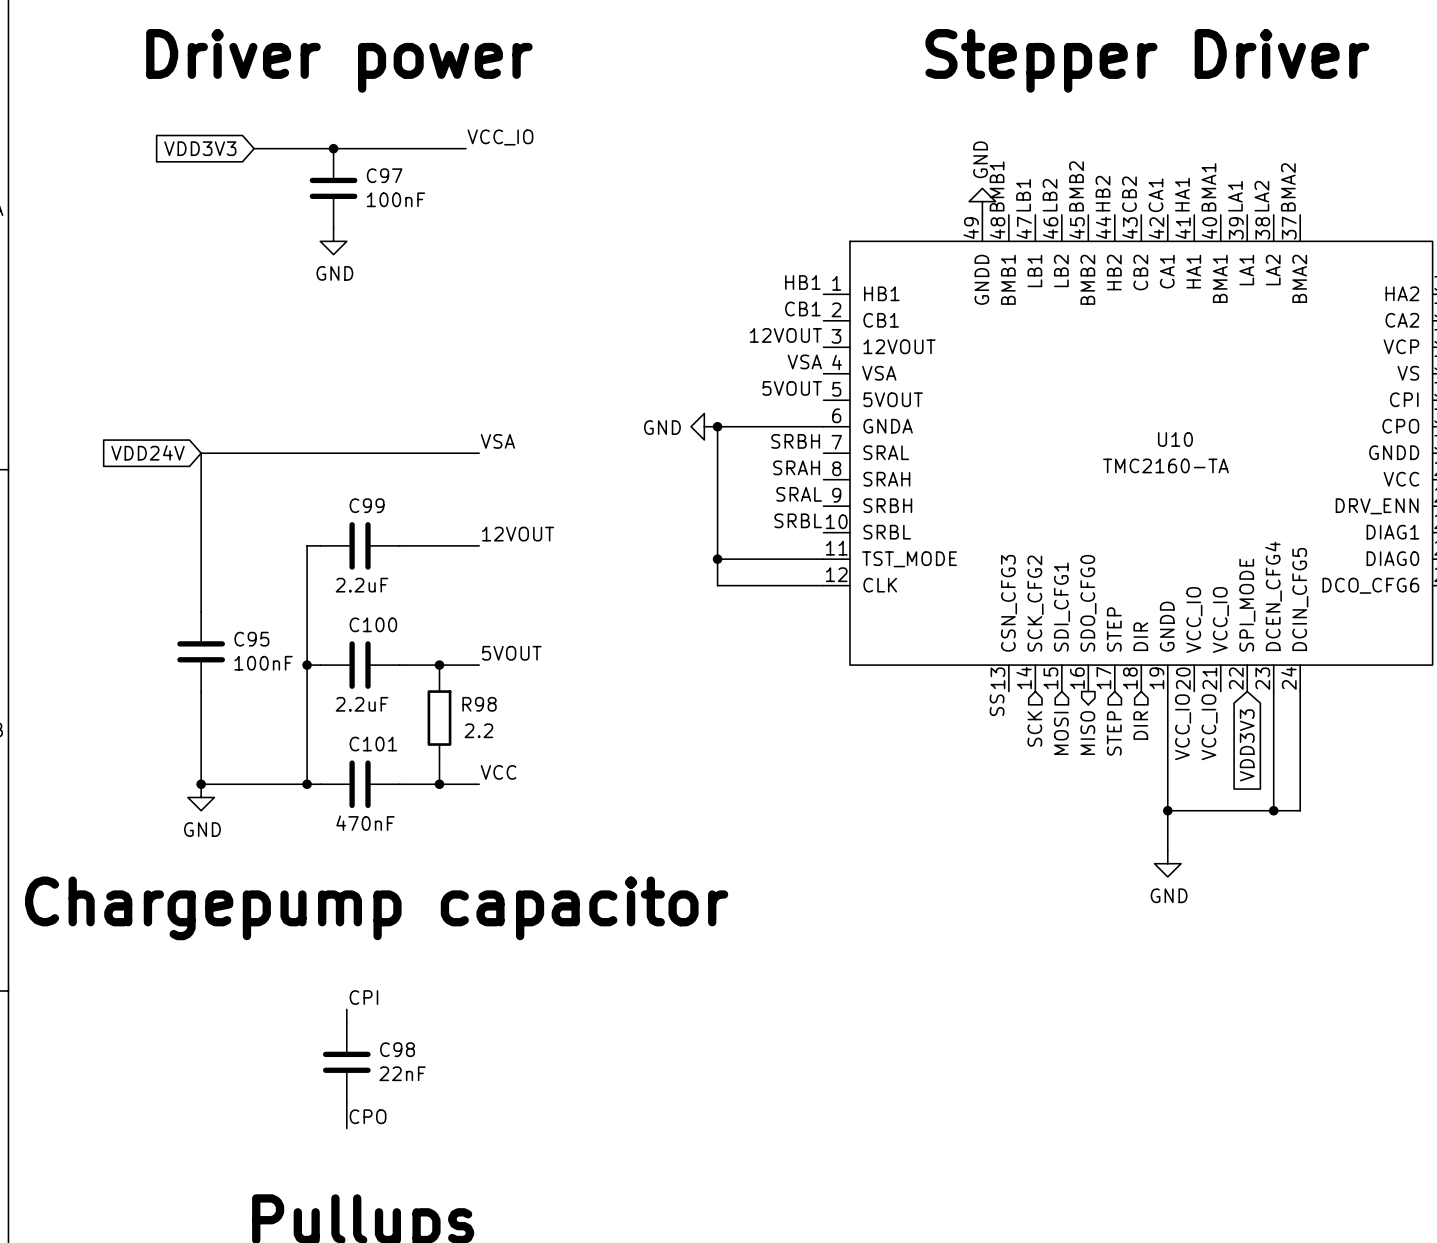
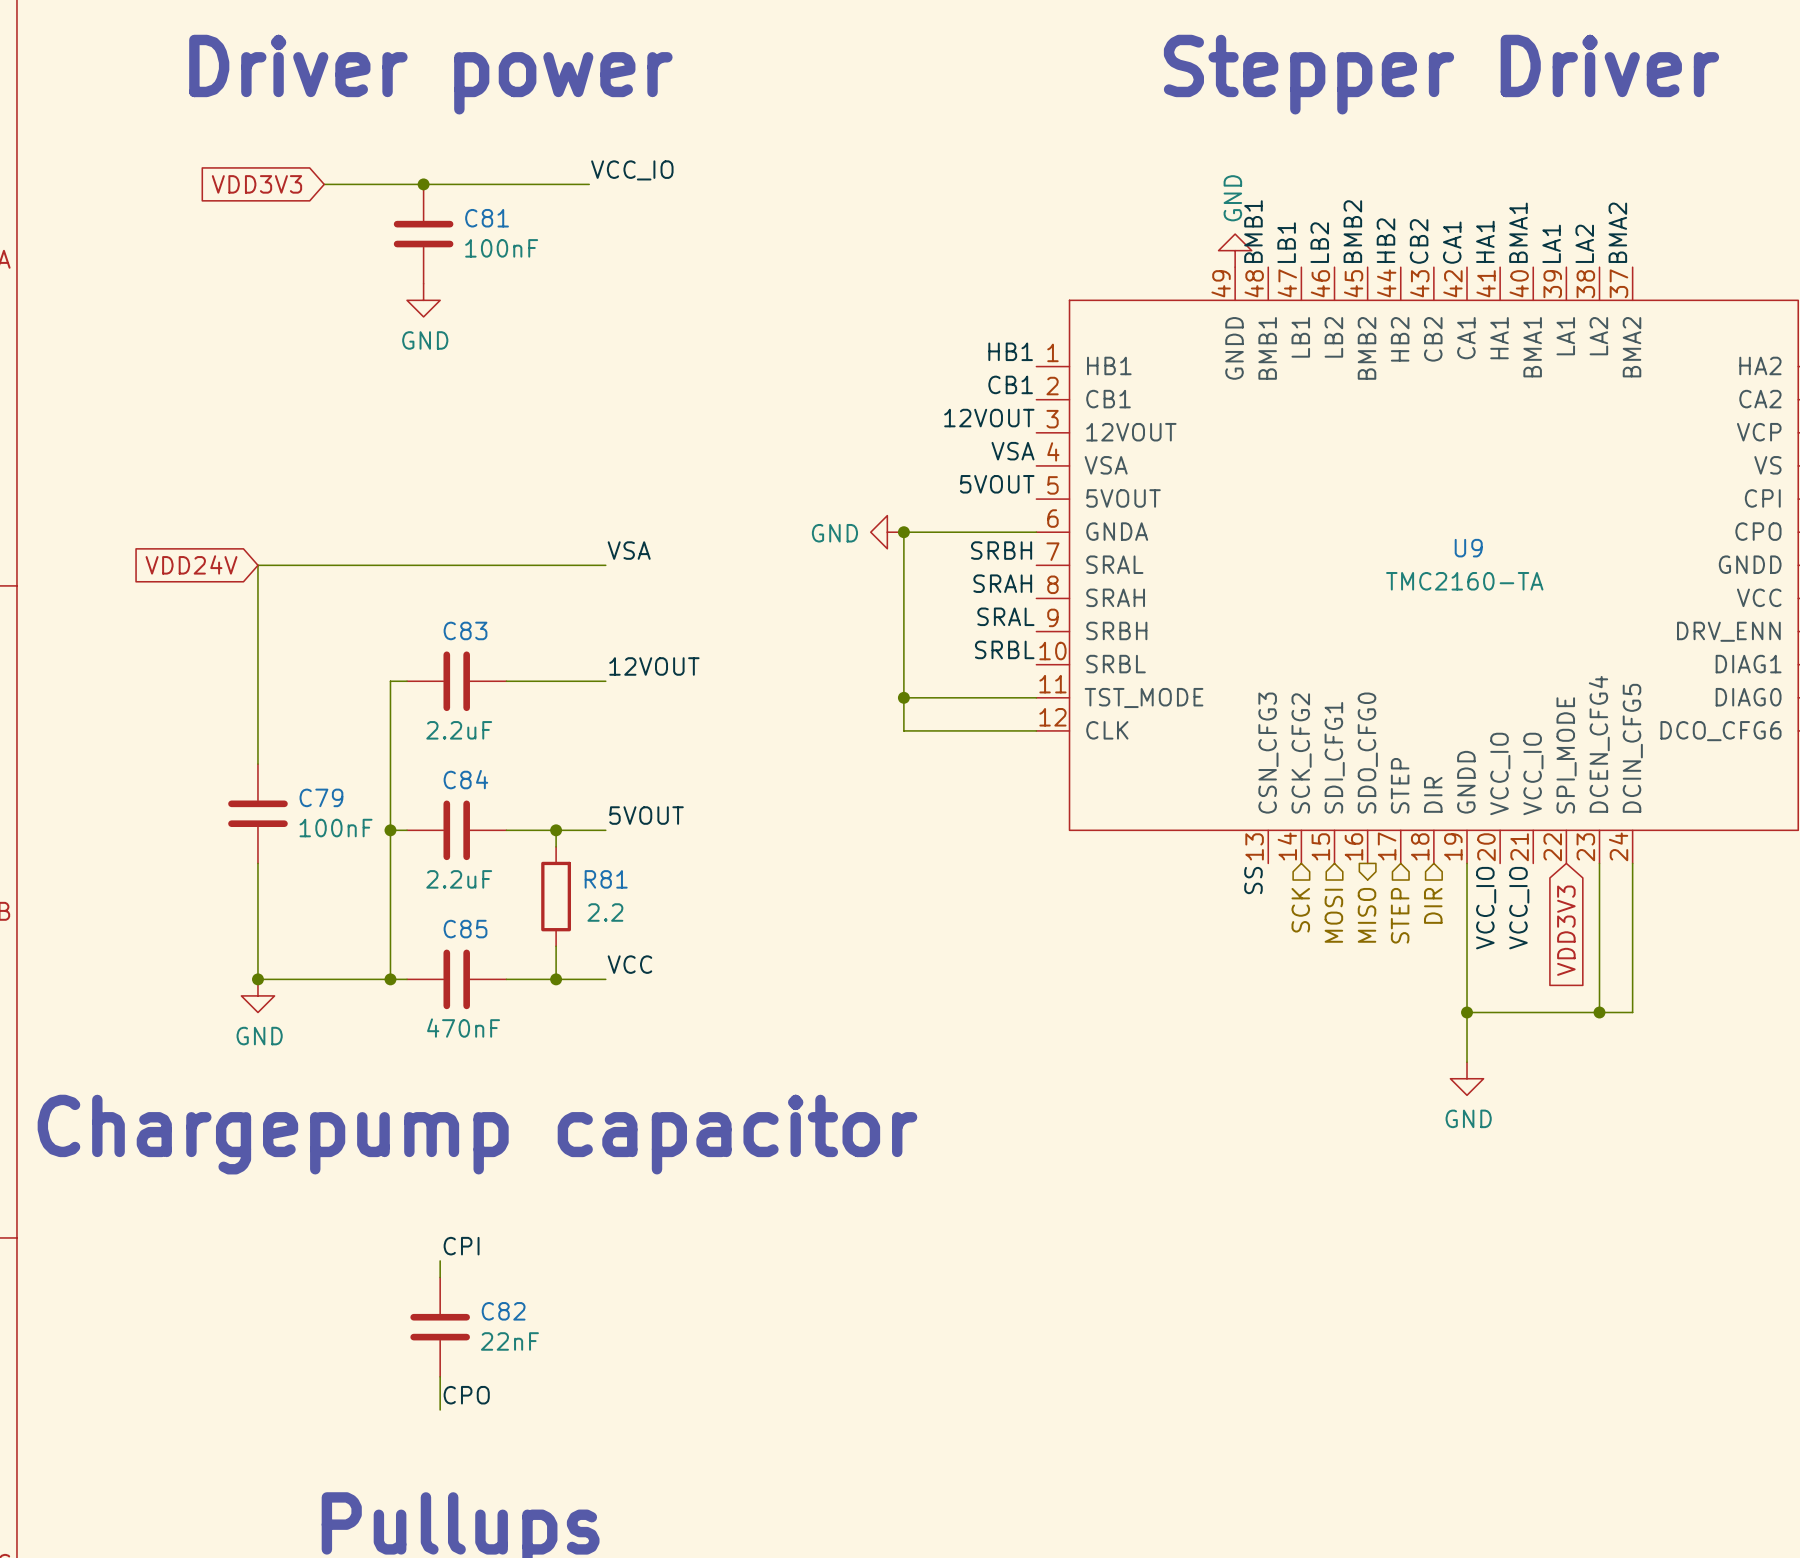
C97 name: C97 (384, 175) -> C81 (487, 218)
U10 name: U10 (1175, 439) -> U9 (1468, 548)
C99 name: C99 (367, 505) -> C83 (465, 630)
C100 name: C100 (373, 624) -> C84 (465, 779)
C95 name: C95 (251, 639) -> C79 (321, 797)
R98 name: R98 (479, 704) -> R81 (606, 879)
C101 name: C101 (373, 744) -> C85 (465, 929)
C98 name: C98 (397, 1049) -> C82 (503, 1311)

